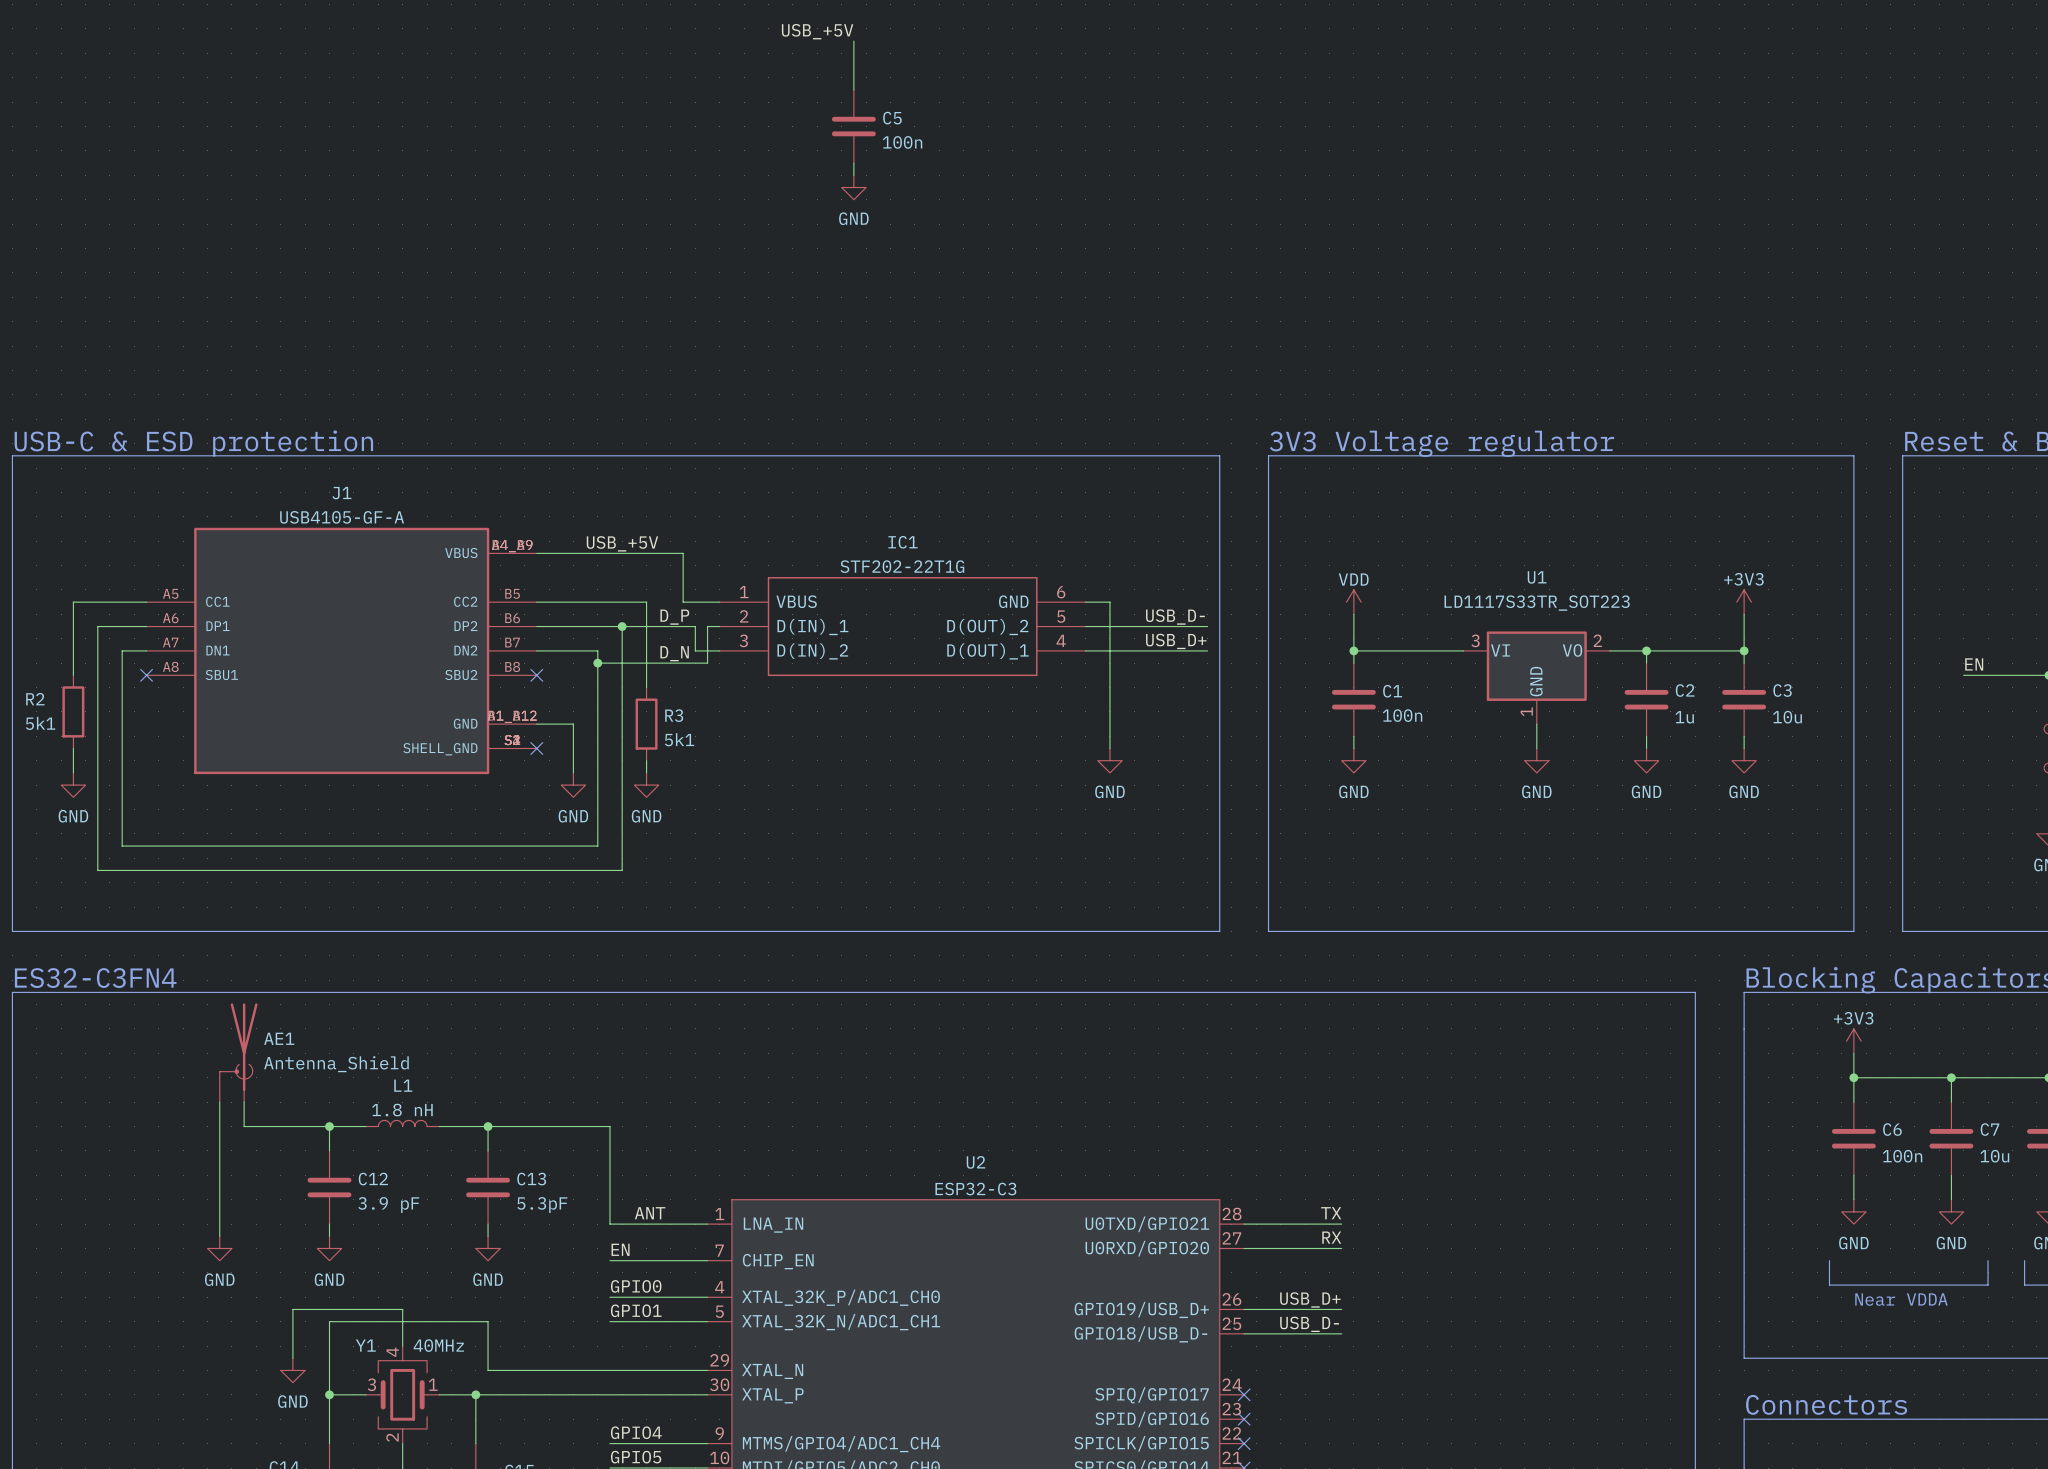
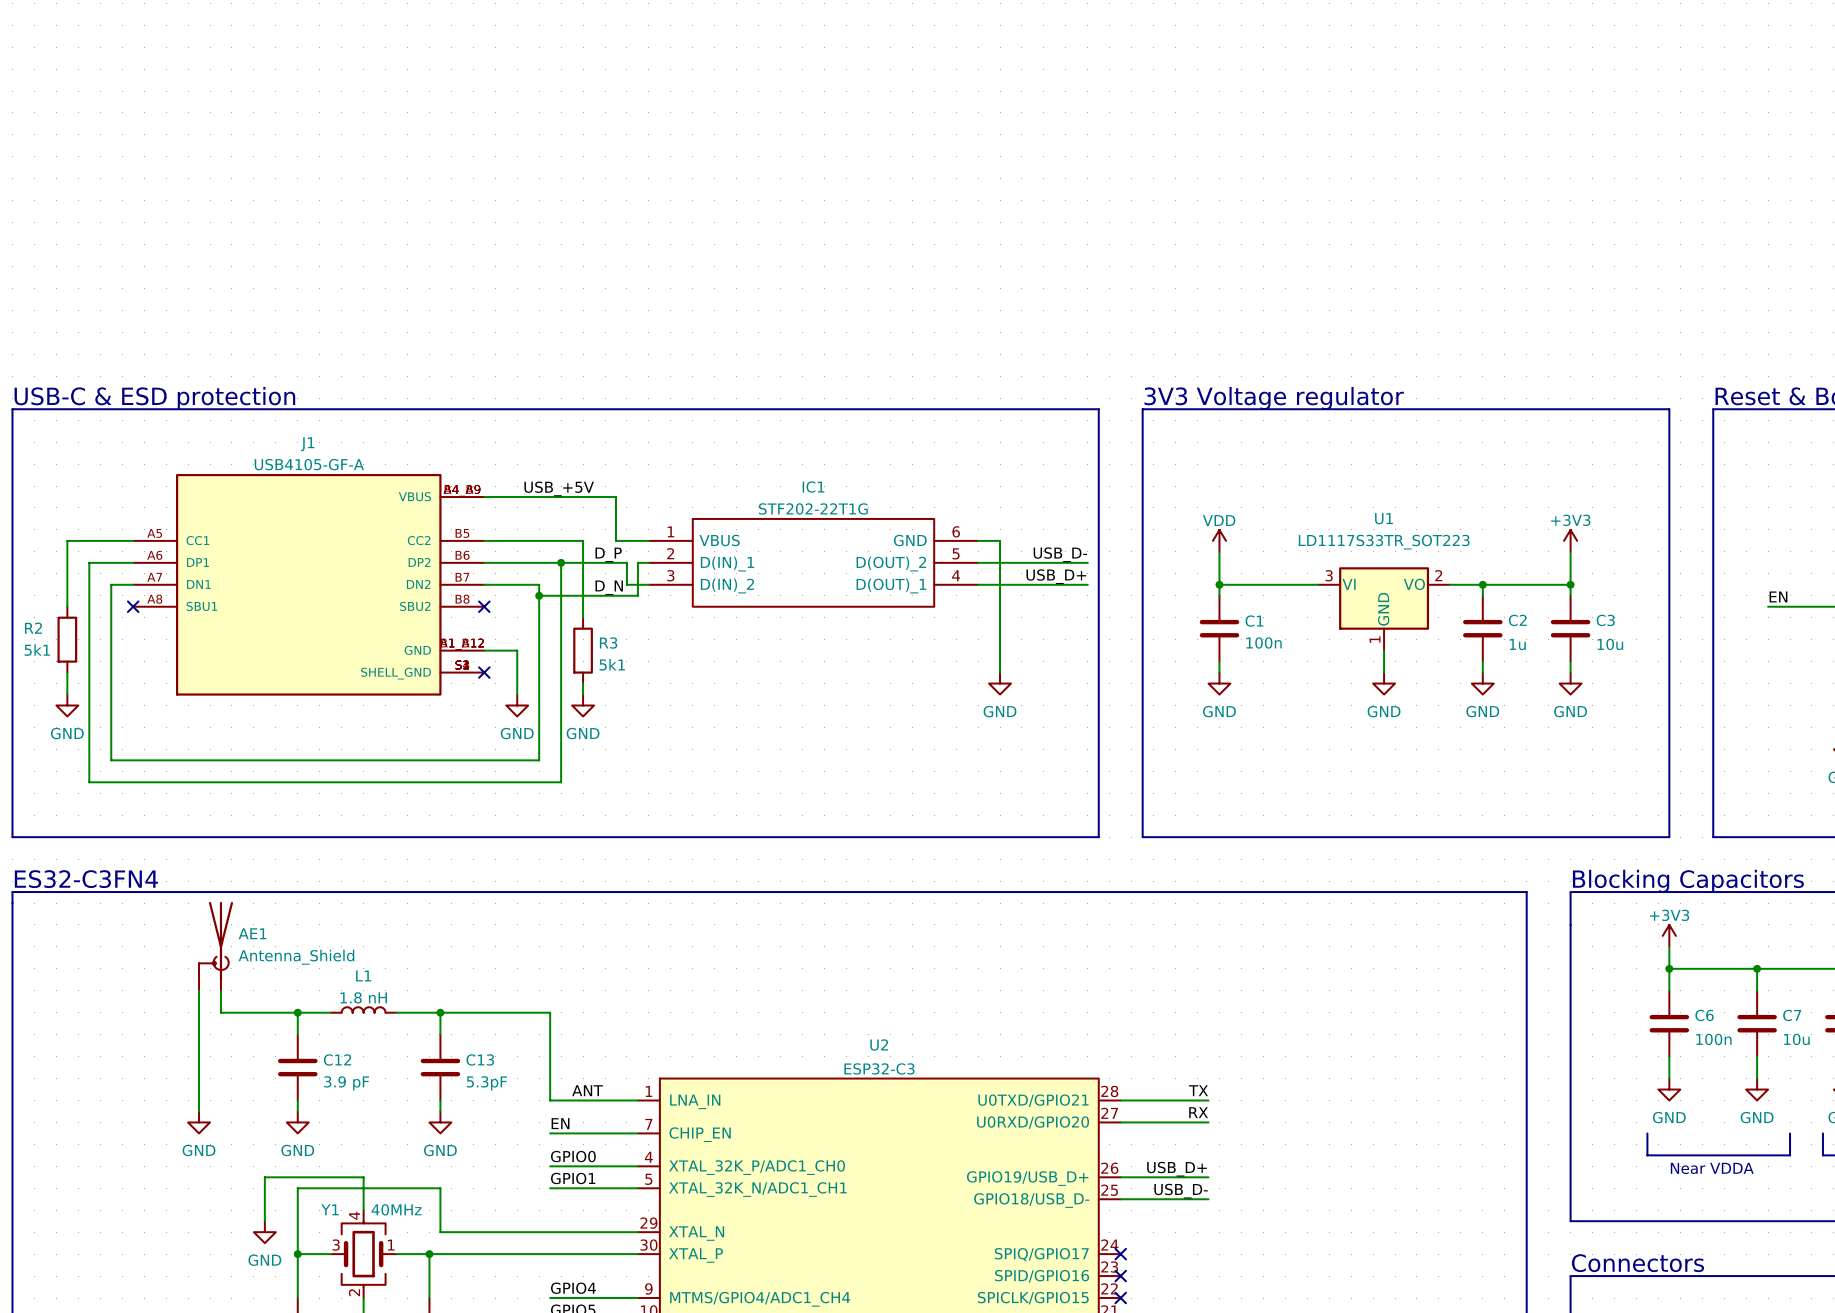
label: USB_+5V (817, 31) -> none
wire: (853, 41) (853, 89) -> none
C5: 100n (853, 126) -> none
wire: (853, 163) (853, 175) -> none
power symbol: GND (853, 187) -> none

